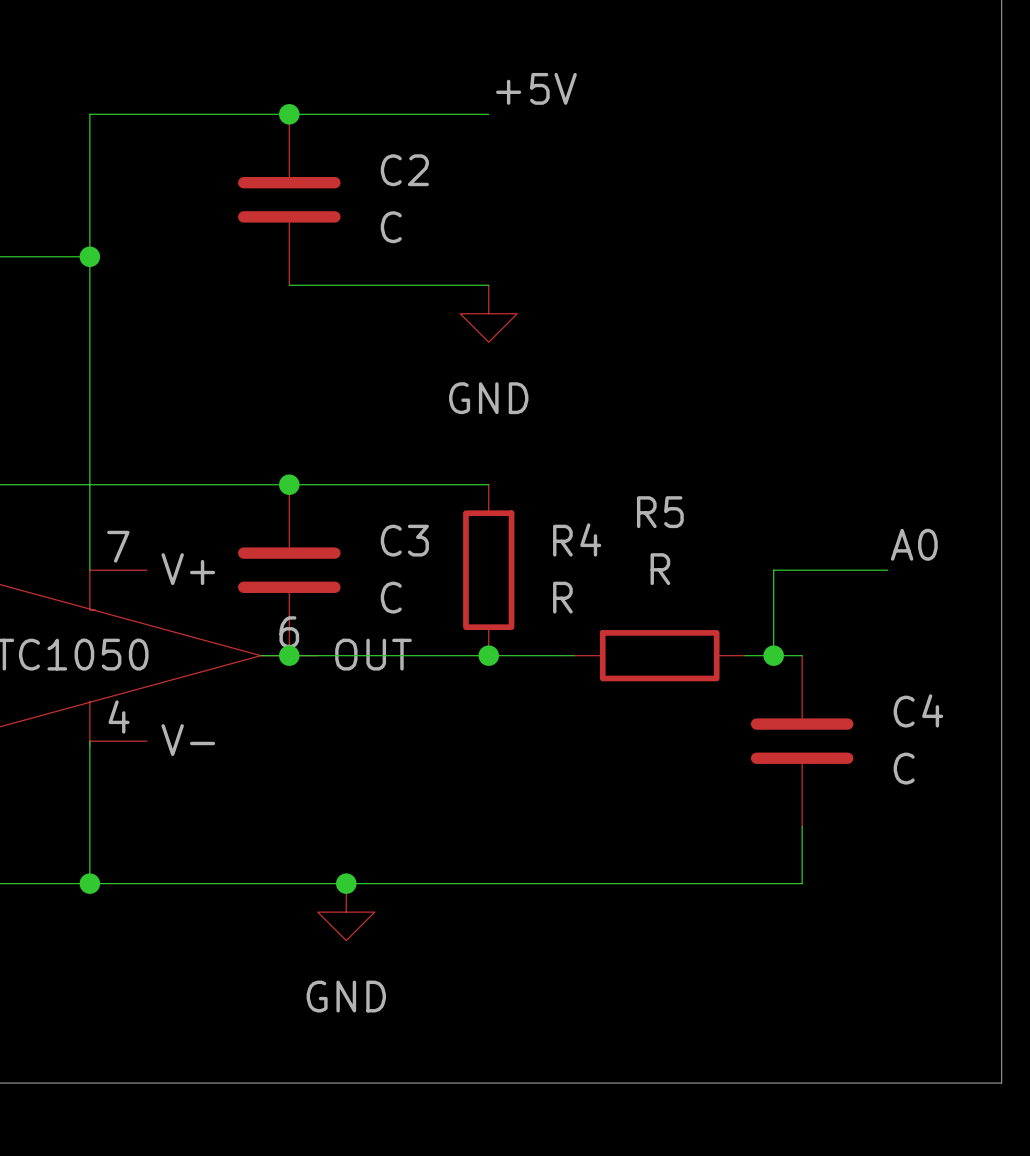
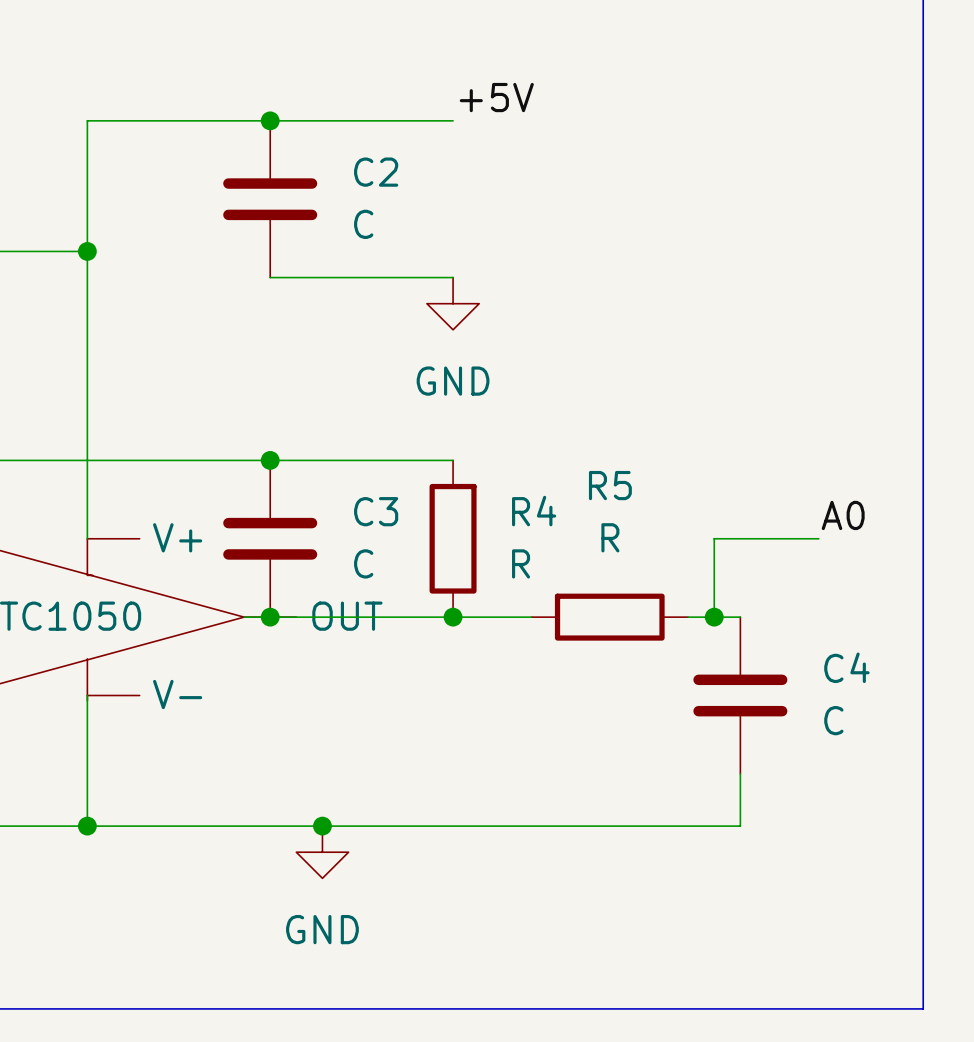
part pin number: 7 (118, 546) -> none
part pin number: 6 (289, 632) -> none
part pin number: 4 (119, 716) -> none

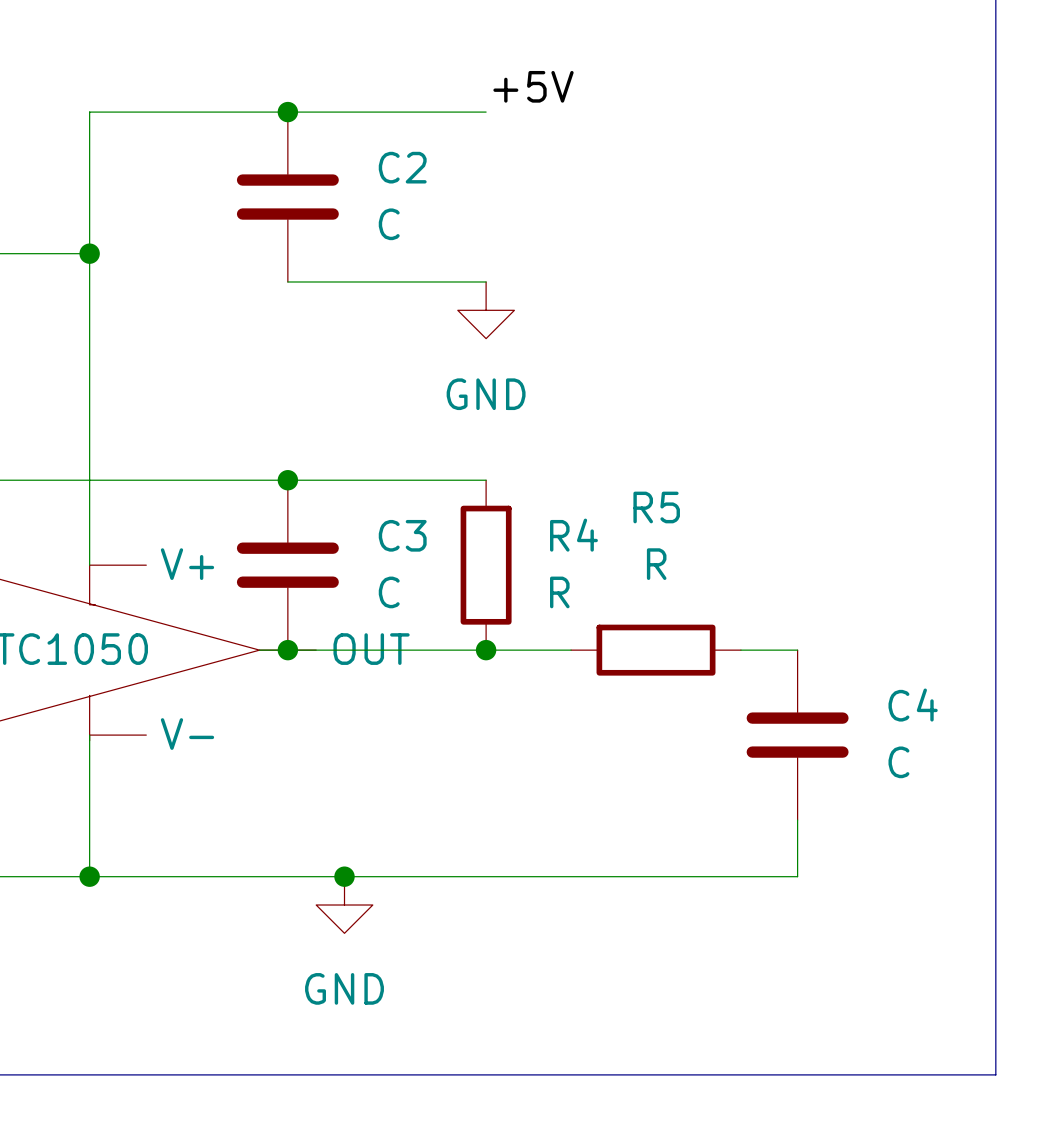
label: A0 (843, 515) -> none
wire: (818, 538) (714, 538) (714, 617) -> none
junction: (714, 617) -> none

